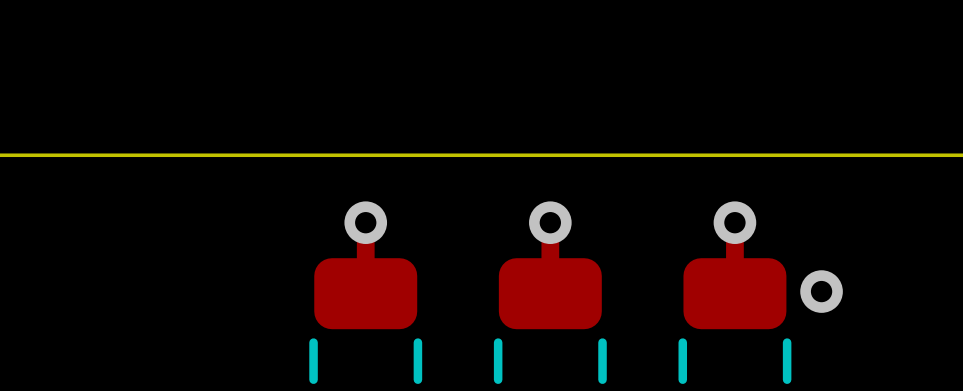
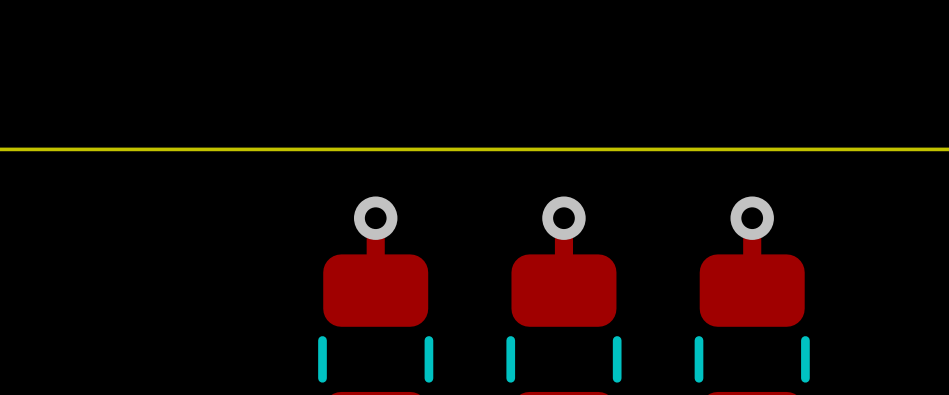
via: (821, 291) -> none

